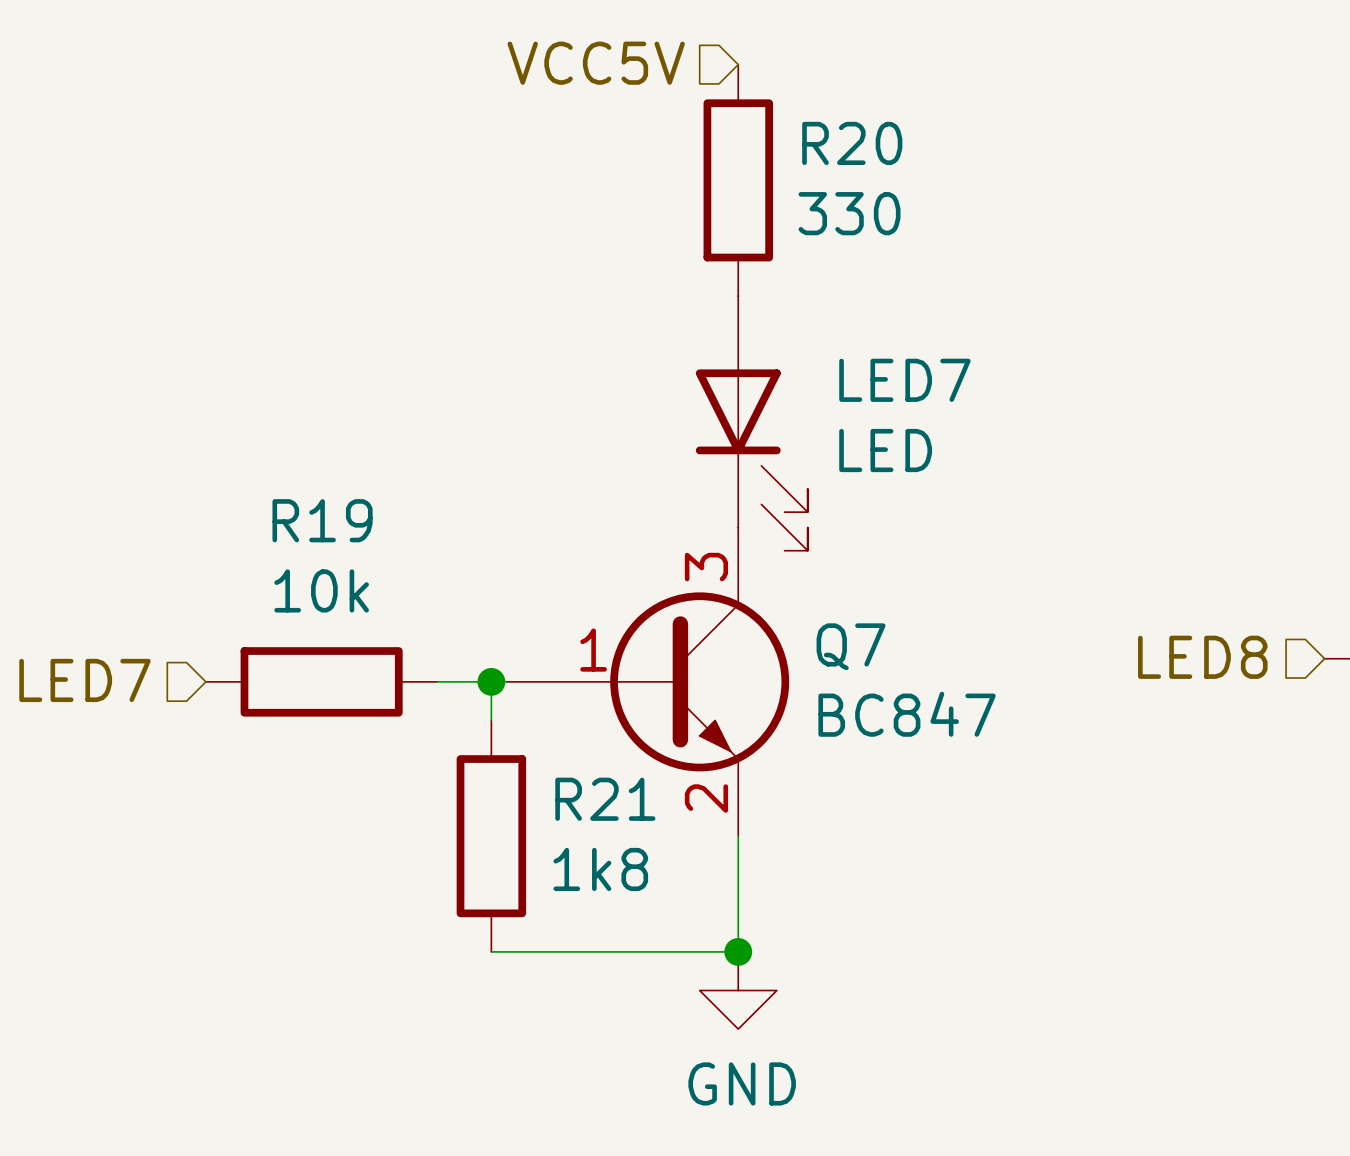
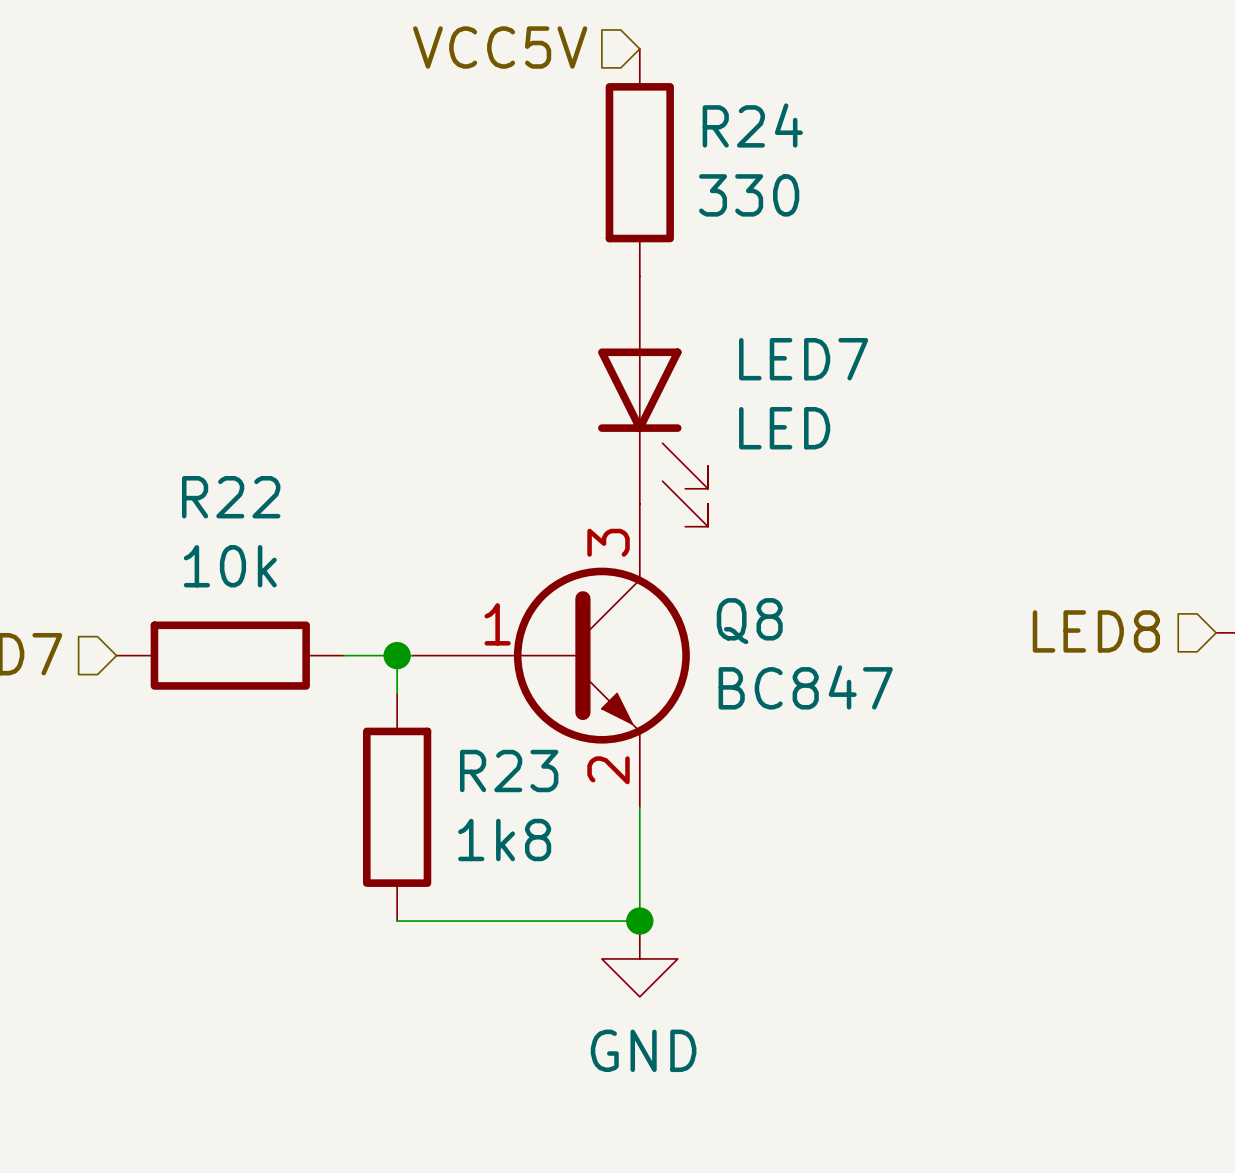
R20 name: R20 (852, 143) -> R24 (752, 125)
R19 name: R19 (322, 520) -> R22 (231, 497)
Q7 name: Q7 (851, 646) -> Q8 (749, 621)
R21 name: R21 (605, 799) -> R23 (509, 770)

